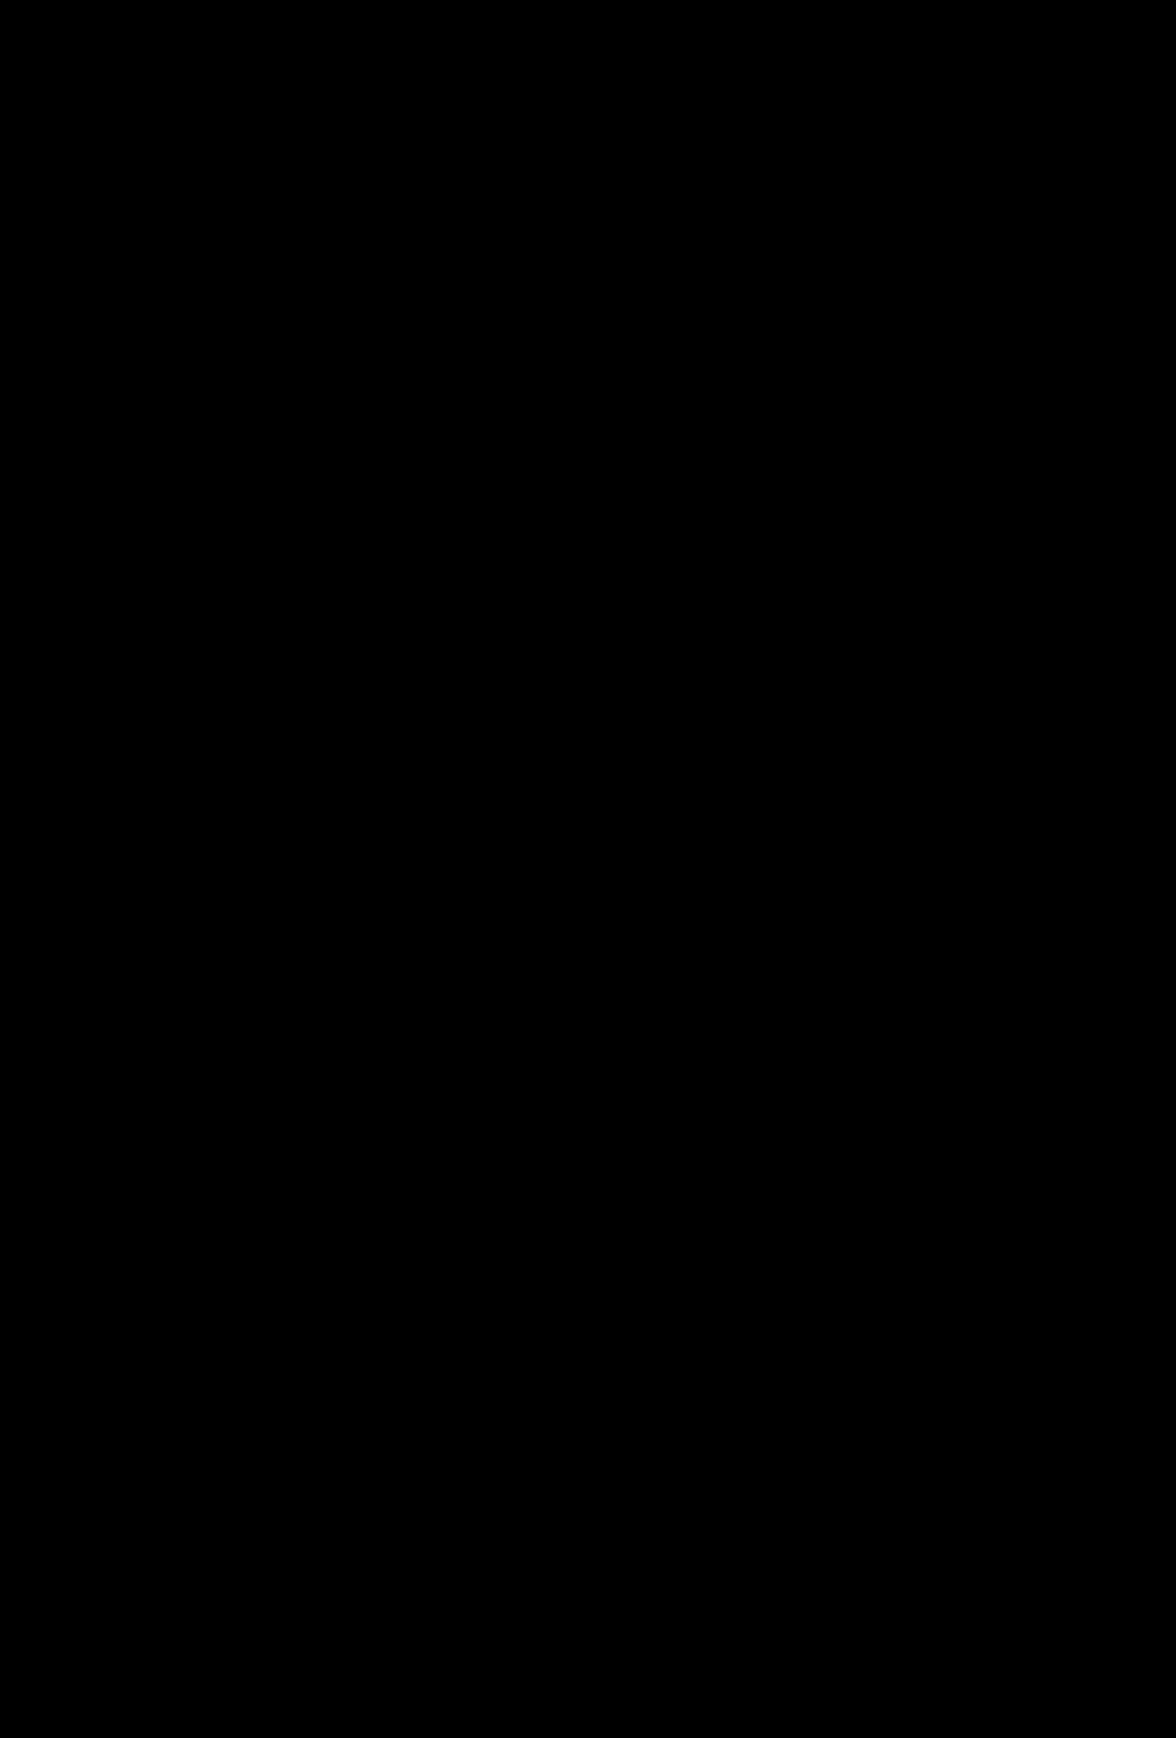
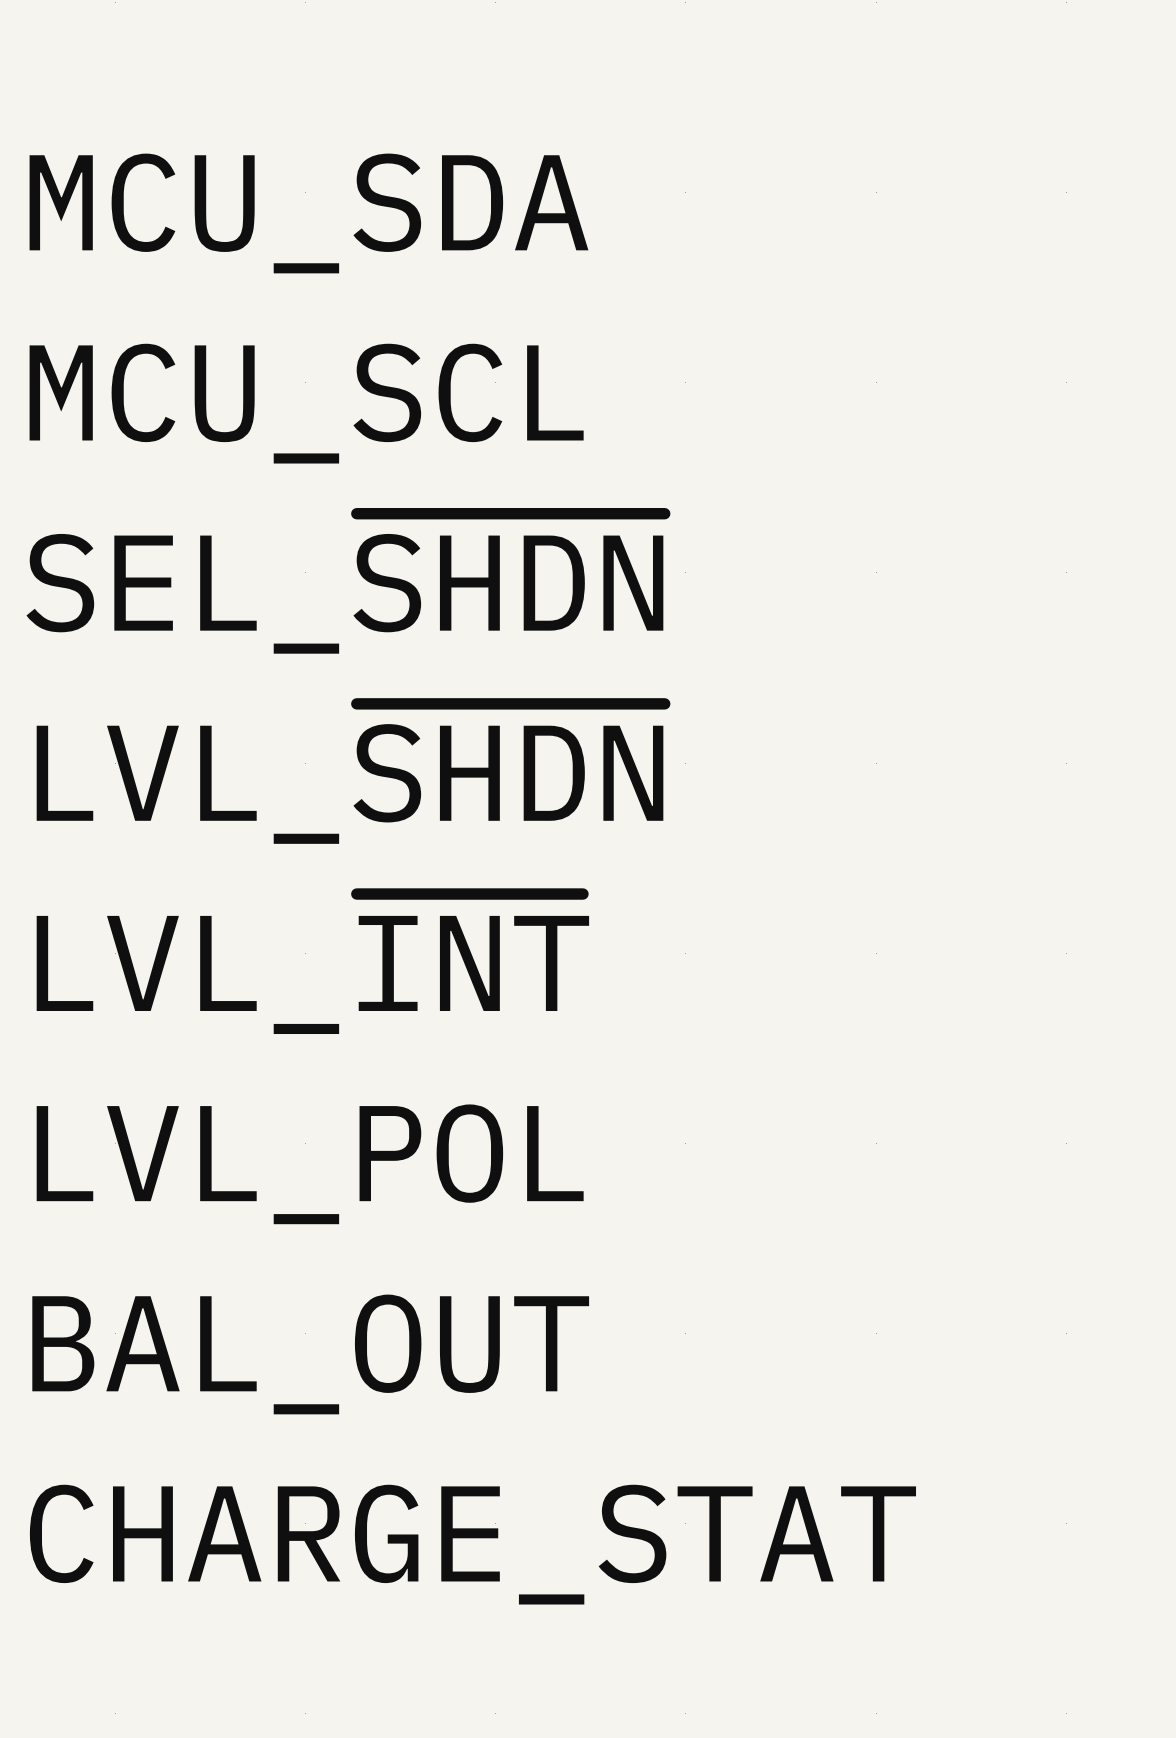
label: none -> MCU_SDA (309, 213)
label: none -> MCU_SCL (306, 403)
label: none -> SEL_~{SHDN} (345, 583)
label: none -> LVL_~{SHDN} (350, 773)
label: none -> LVL_~{INT} (312, 964)
label: none -> LVL_POL (310, 1164)
label: none -> BAL_OUT (310, 1354)
label: none -> CHARGE_STAT (472, 1544)

